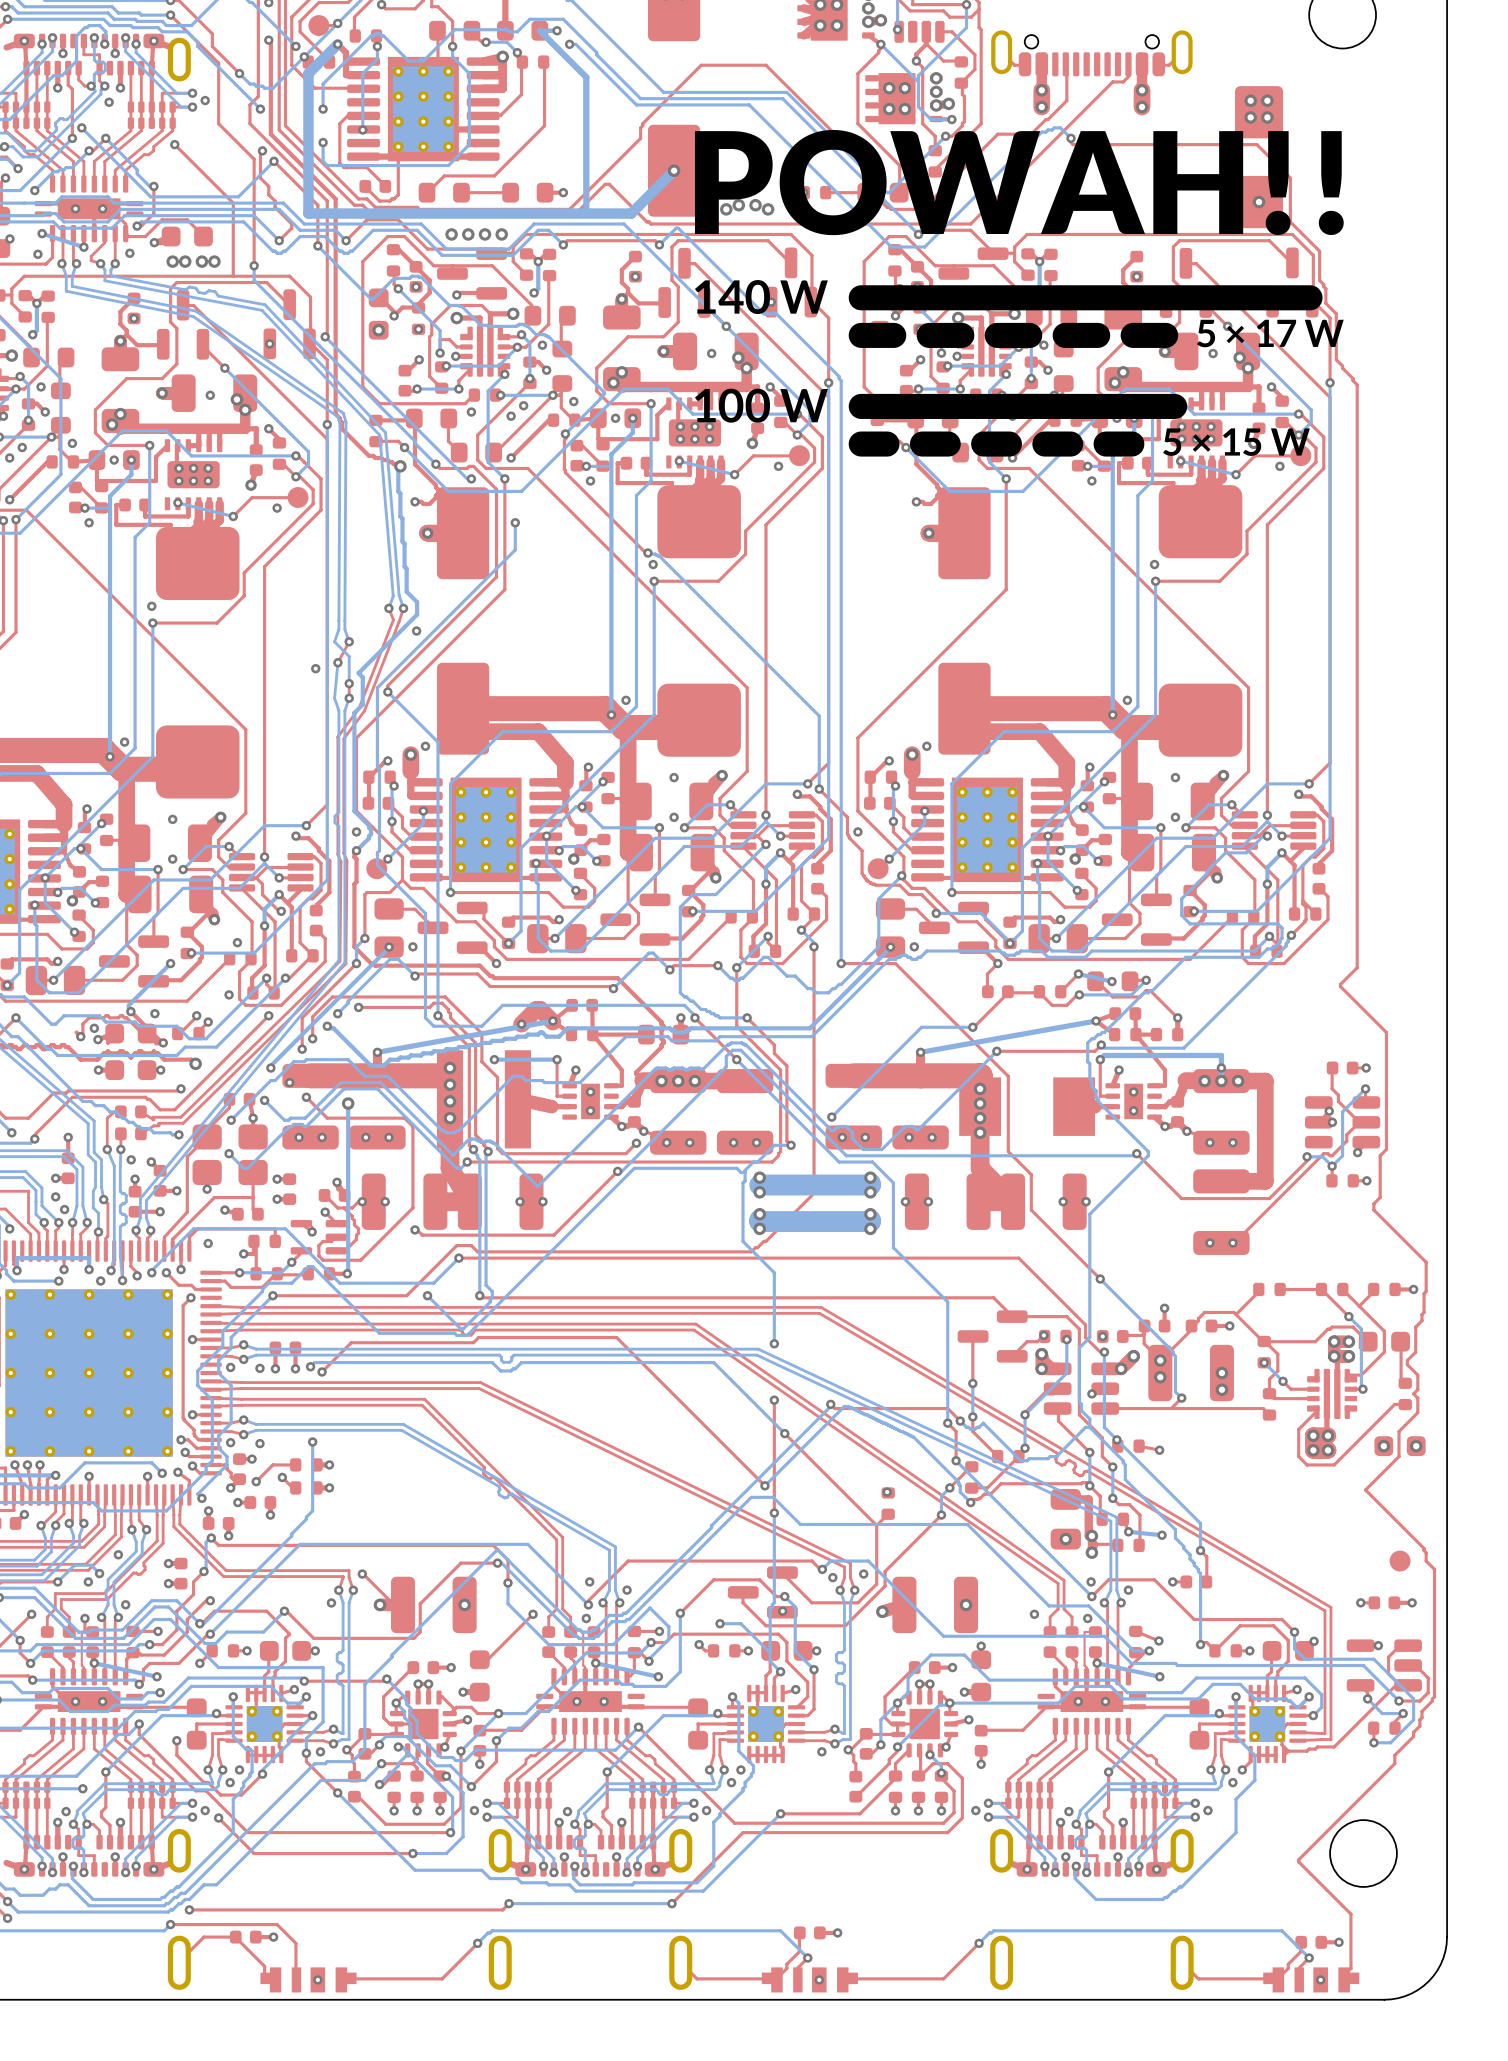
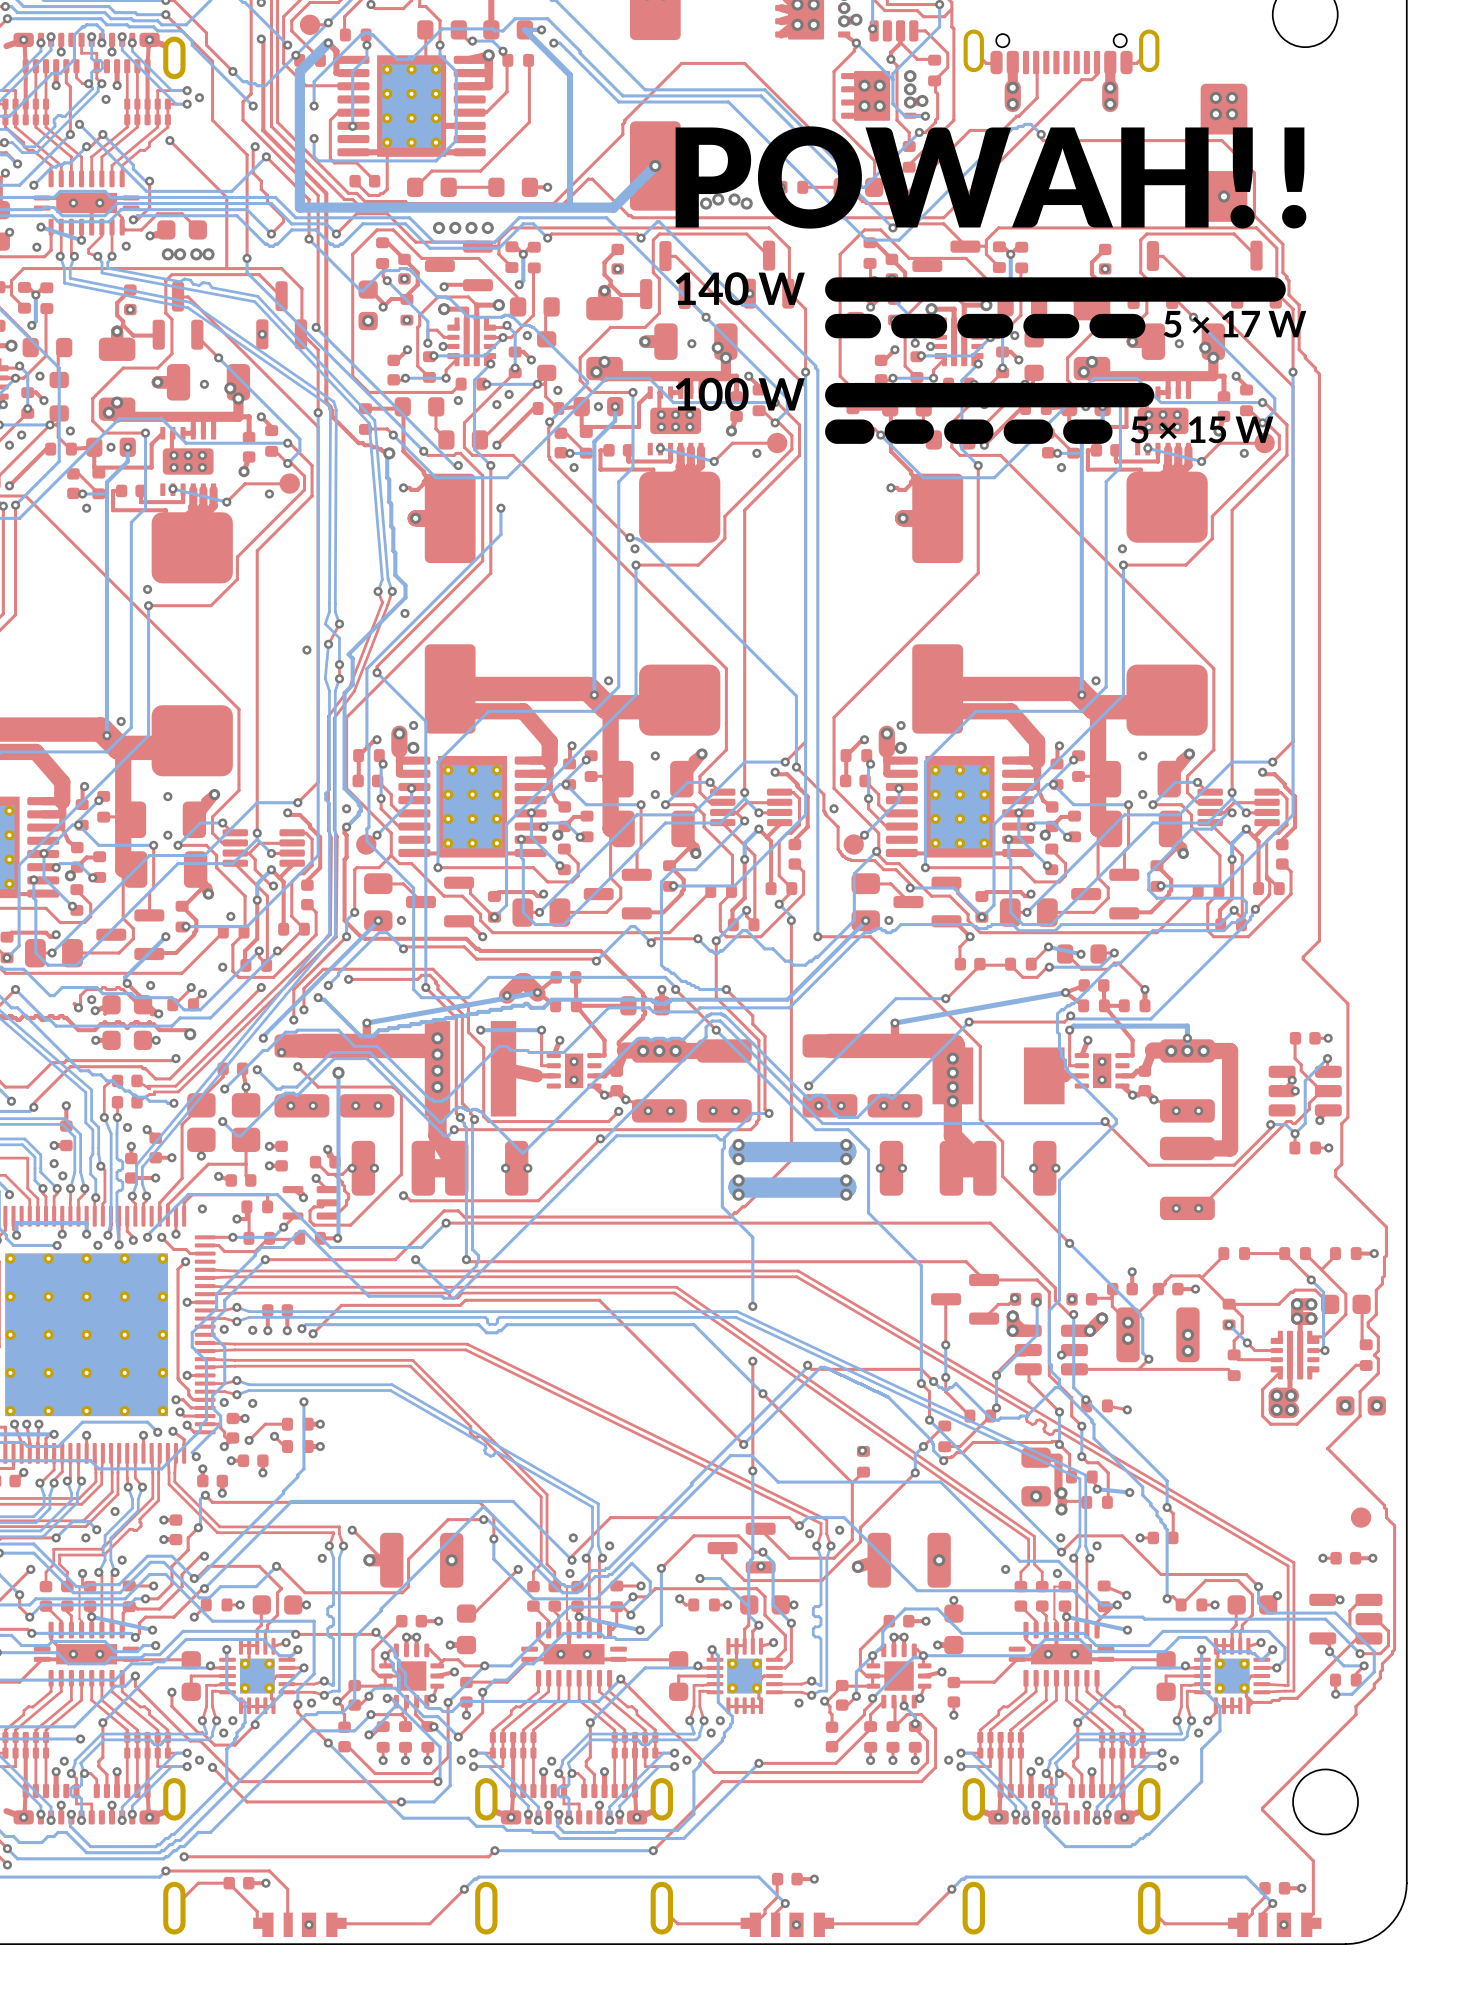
via: none -> (413, 747)
via: none -> (900, 747)

